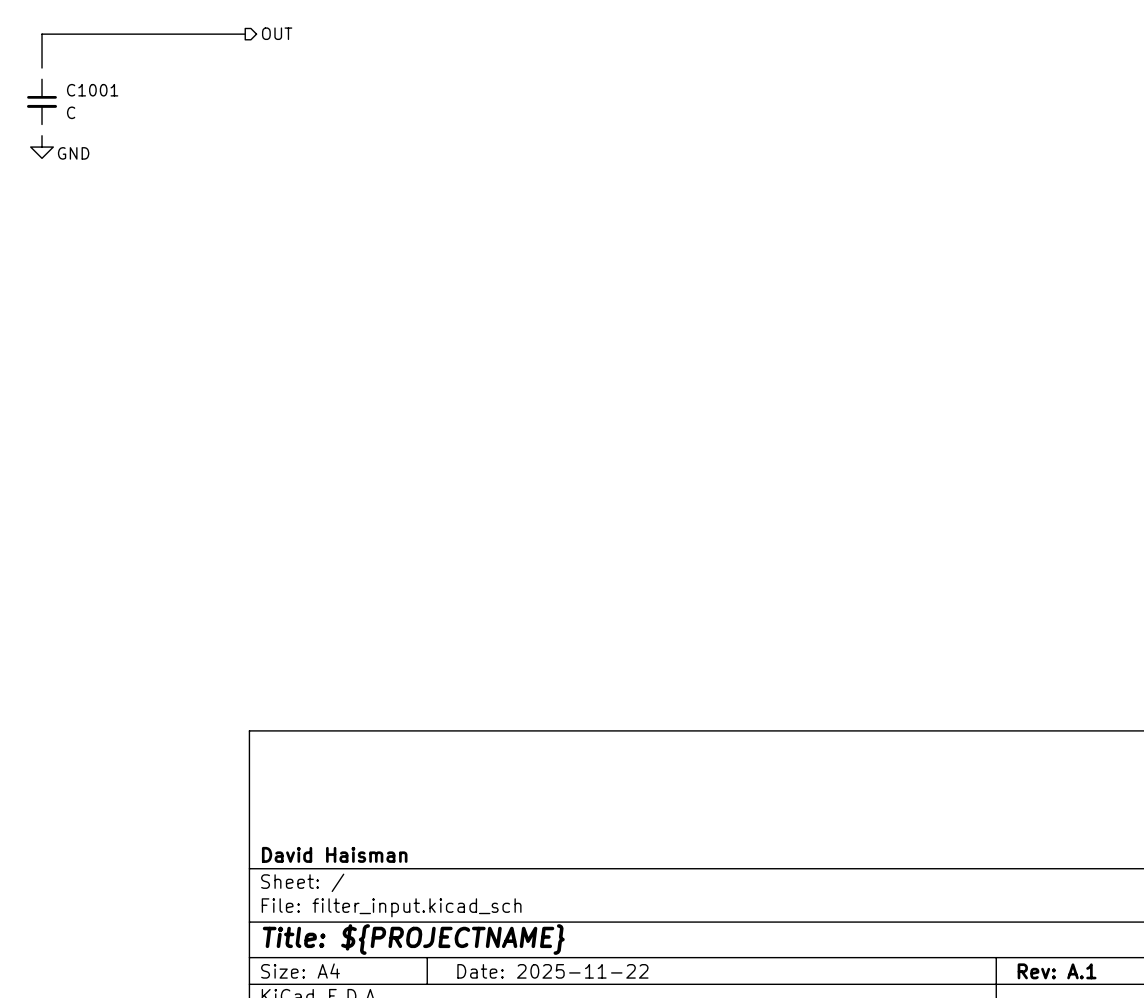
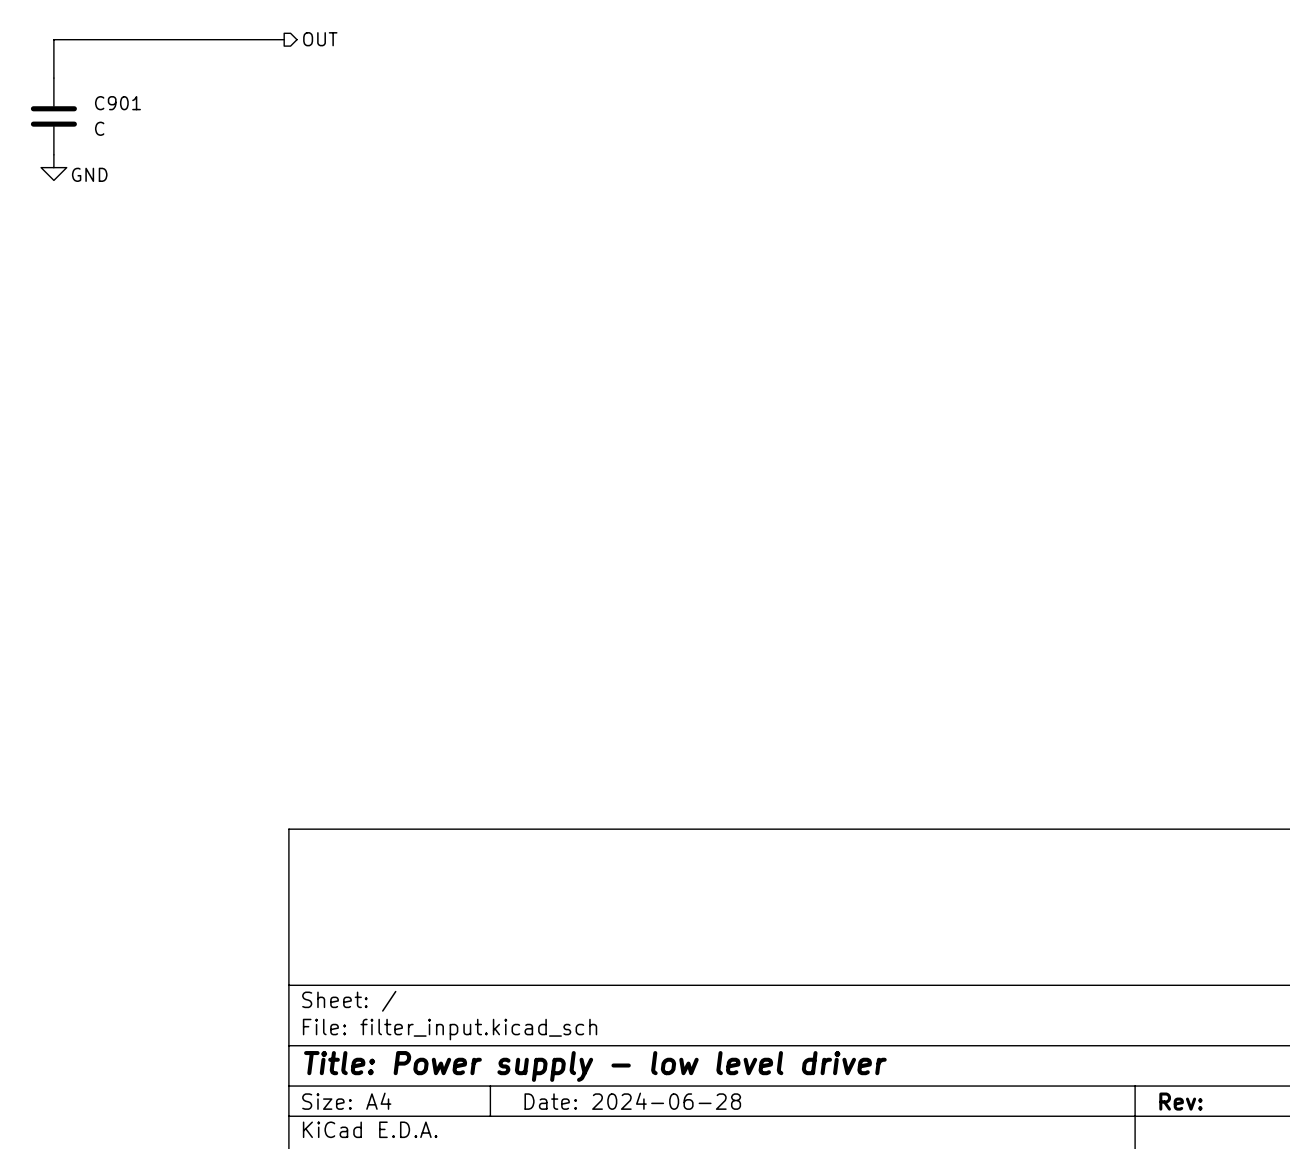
C1001: C (42, 101) -> none
C901: none -> C (53, 116)
title block: David Haisman (334, 854) -> none
title block: Title: ${PROJECTNAME} (413, 939) -> Title: Power supply - low level driver (595, 1066)
title block: Date: 2025-11-22 (552, 971) -> Date: 2024-06-28 (632, 1101)
title block: Rev: A.1 (1057, 971) -> Rev: (1180, 1101)

